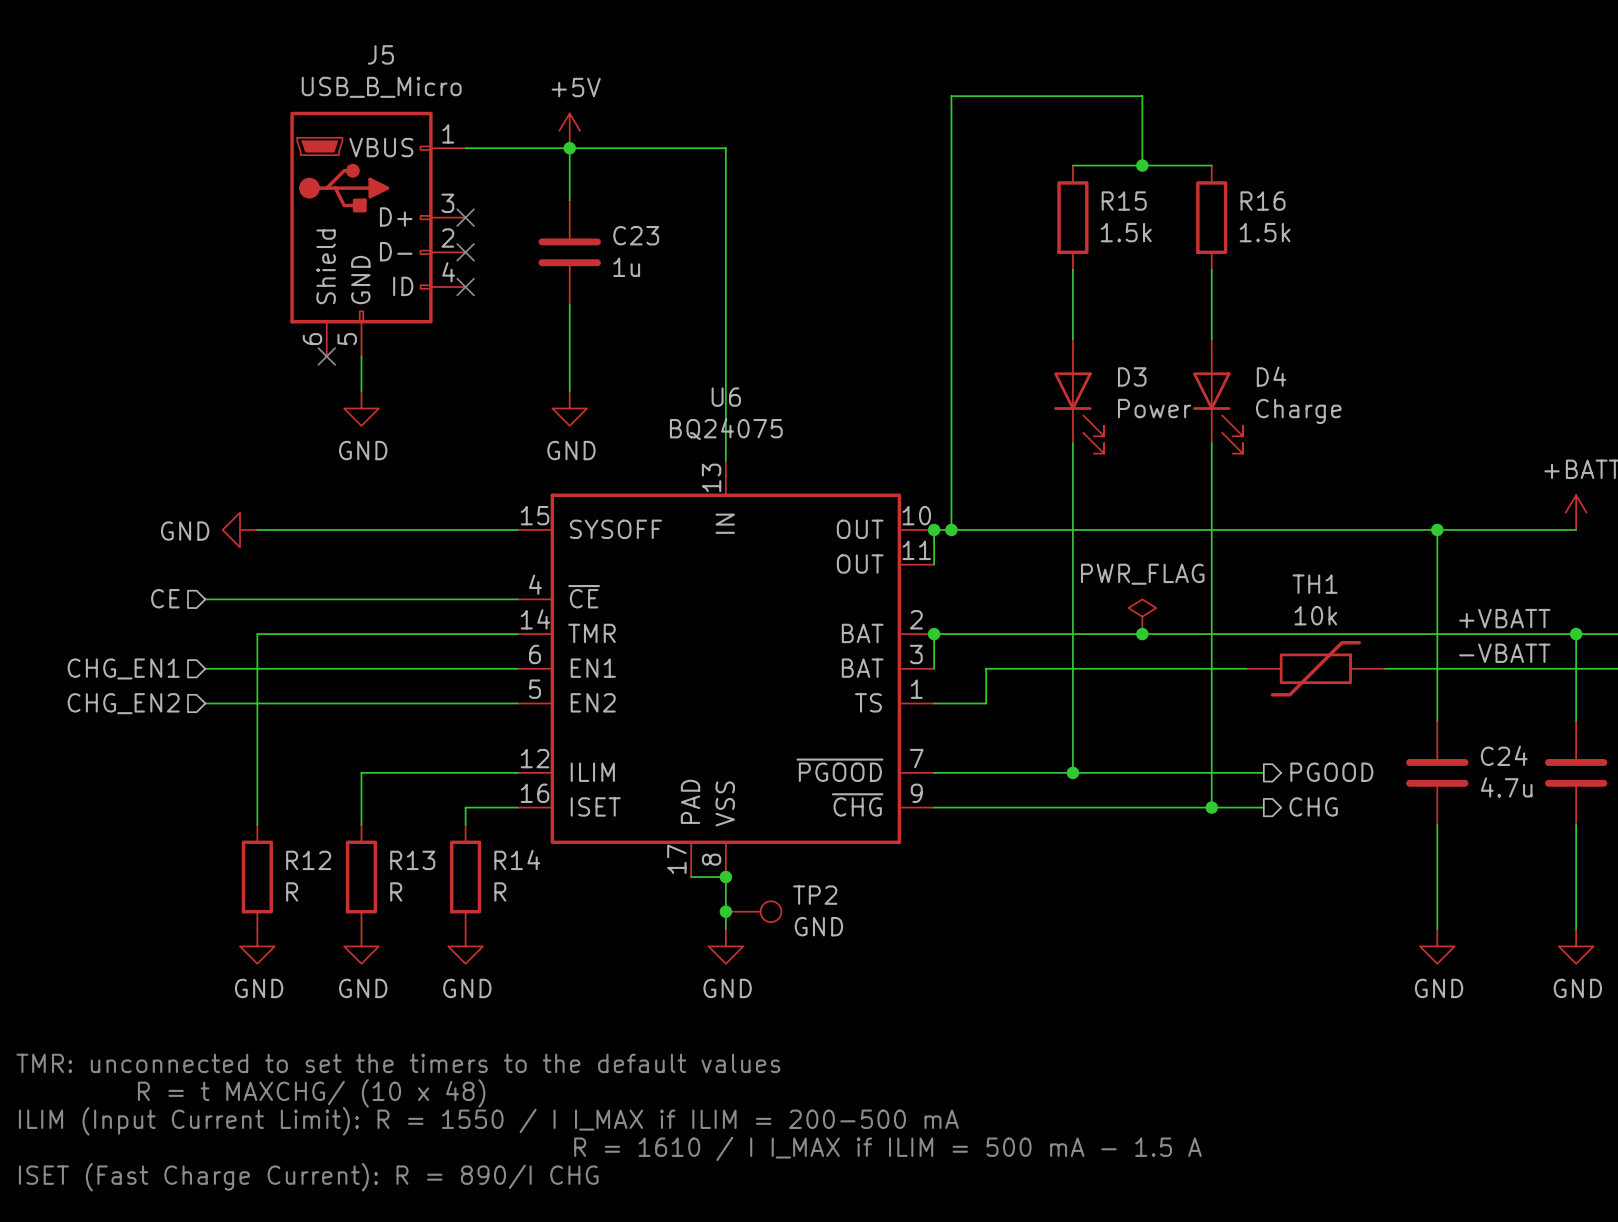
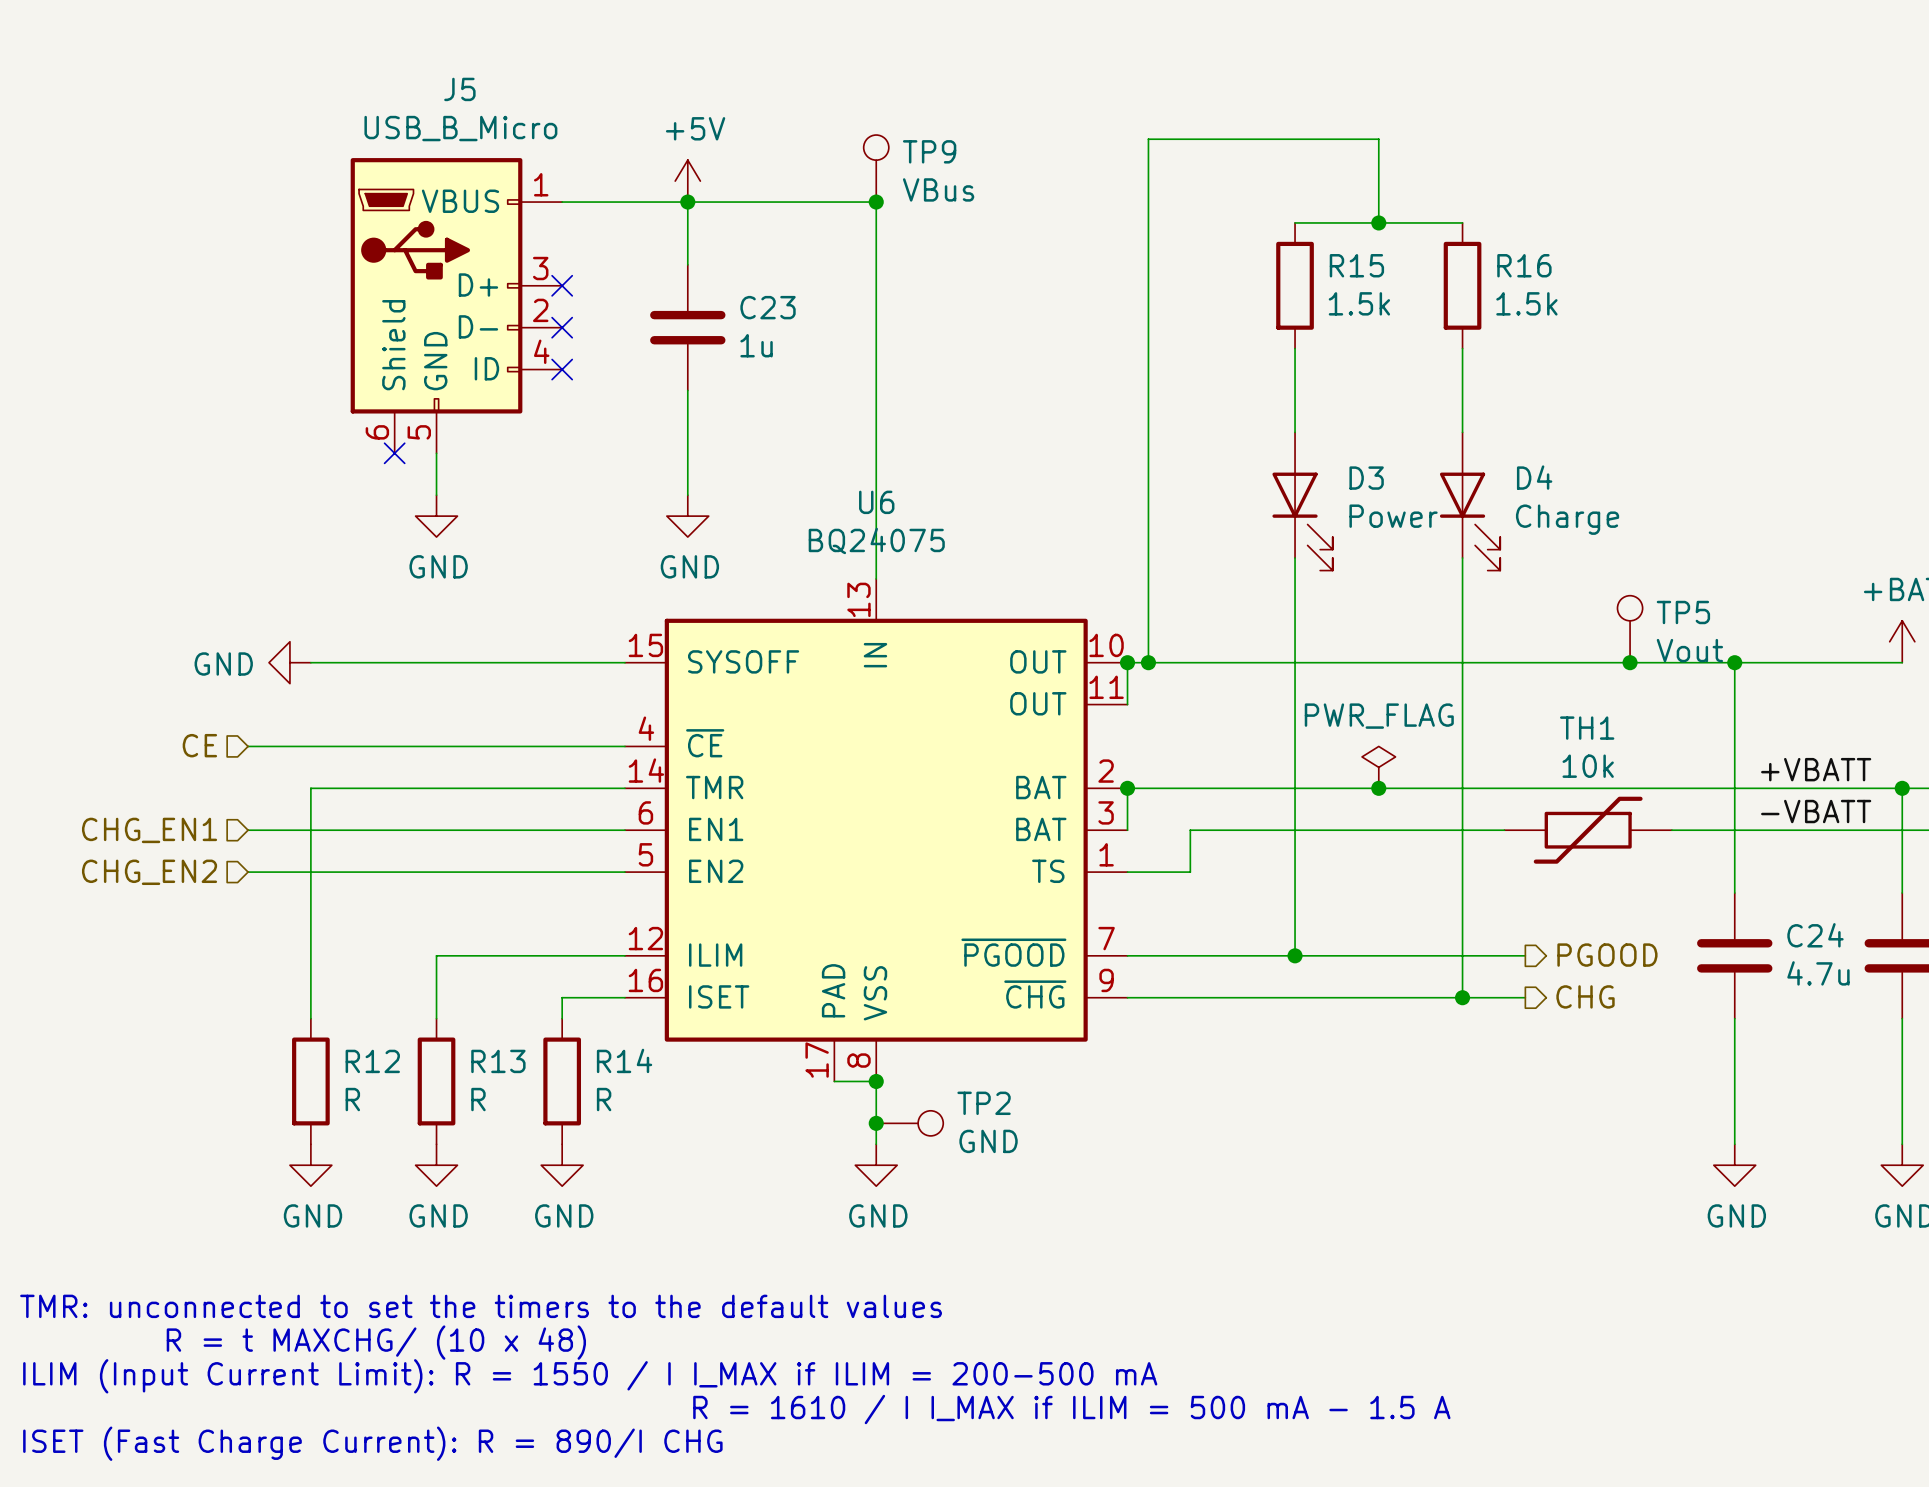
TP9: none -> VBus (876, 168)
junction: none -> (876, 202)
TP5: none -> Vout (1630, 629)
junction: none -> (1630, 662)

